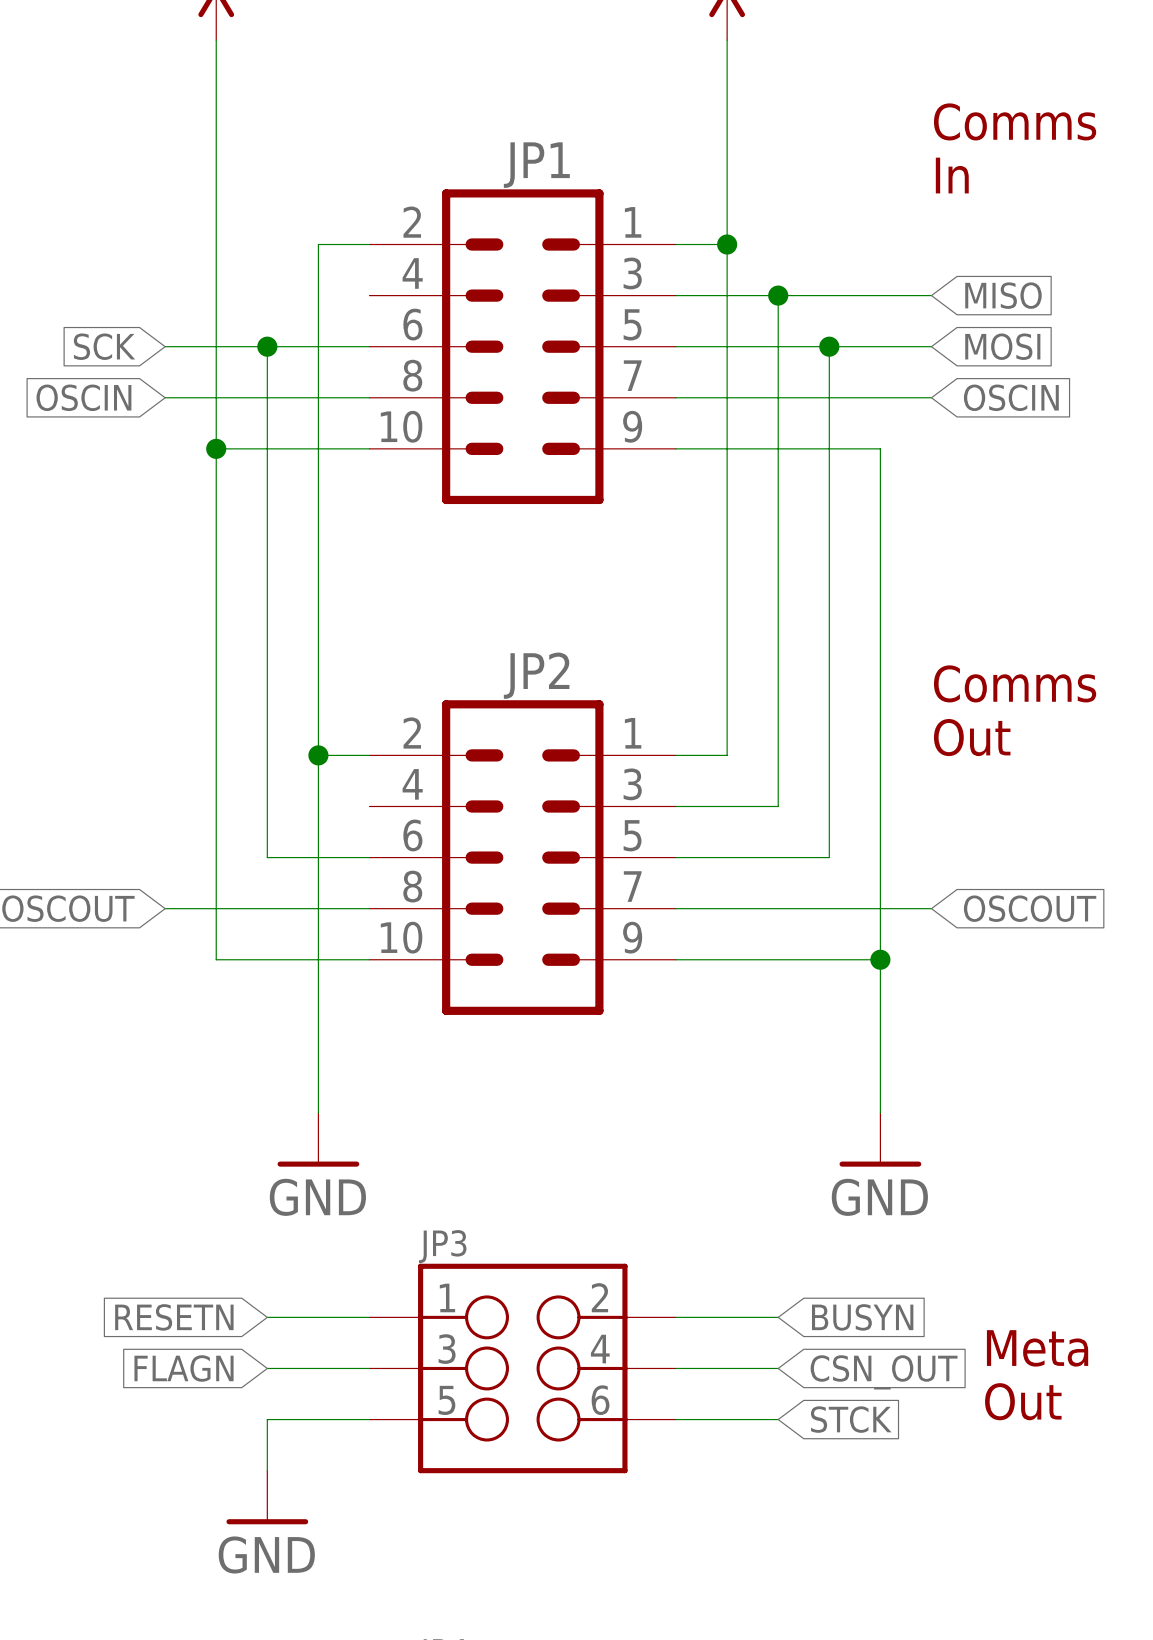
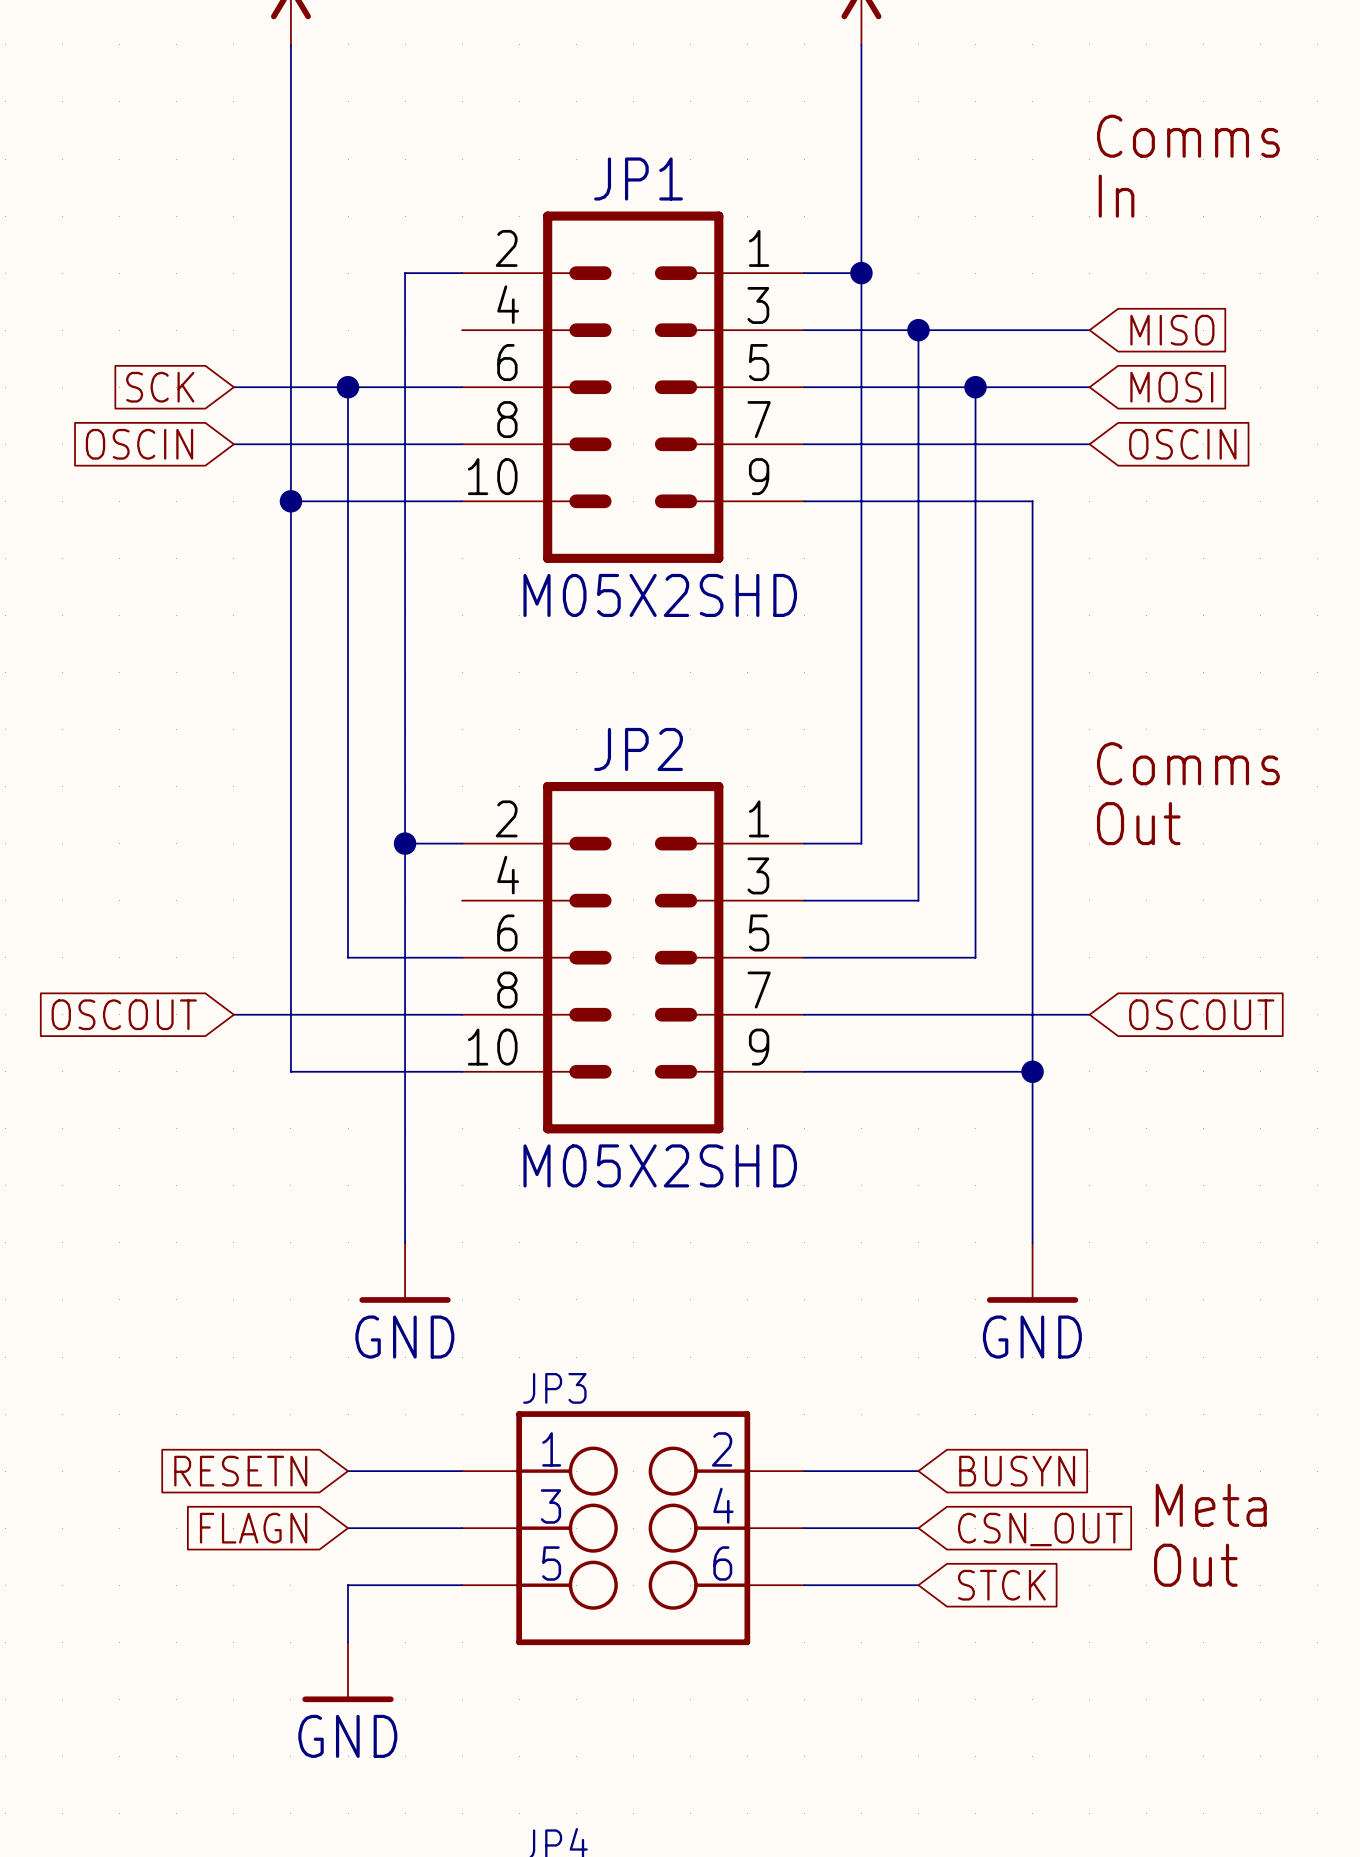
JP1 value: none -> M05X2SHD (660, 595)
JP2 value: none -> M05X2SHD (660, 1165)

